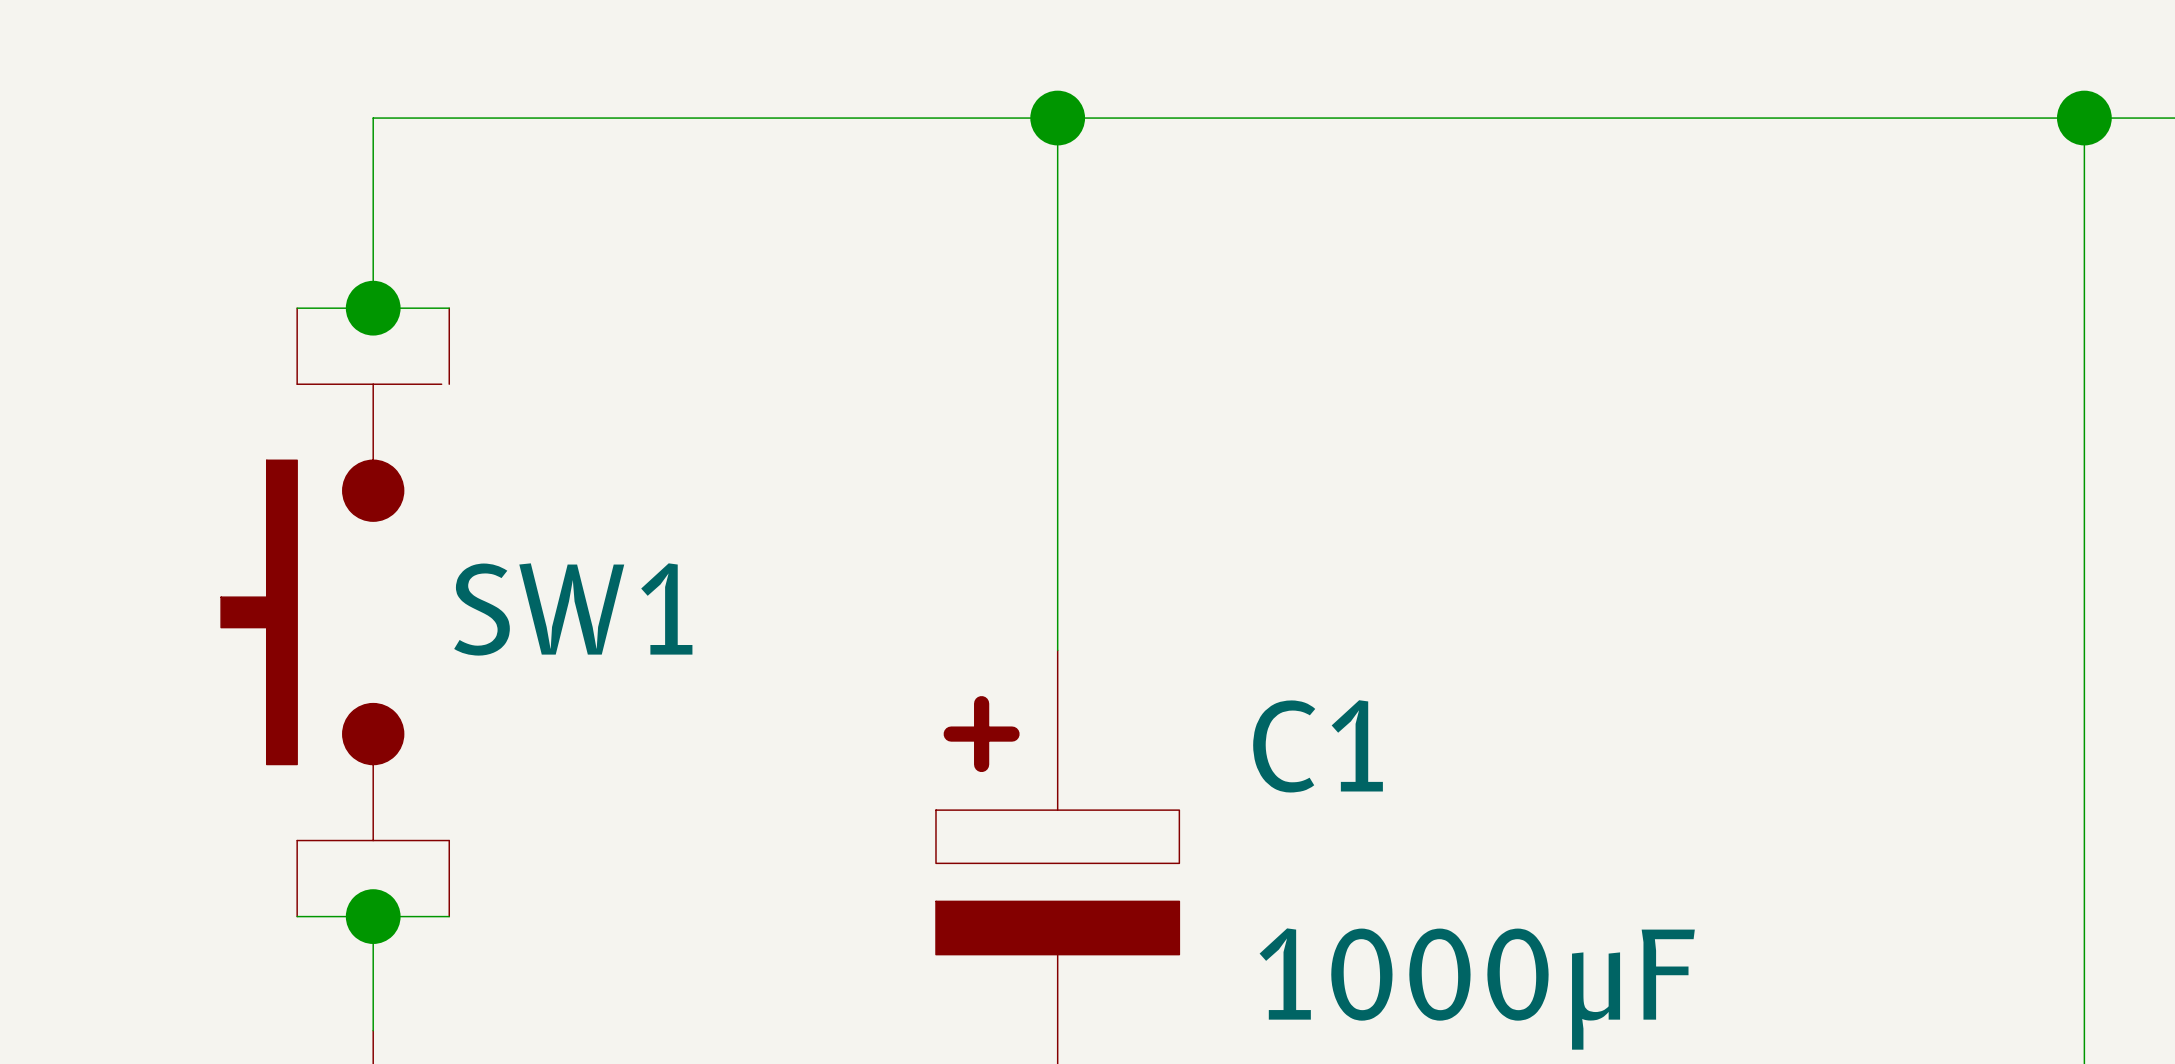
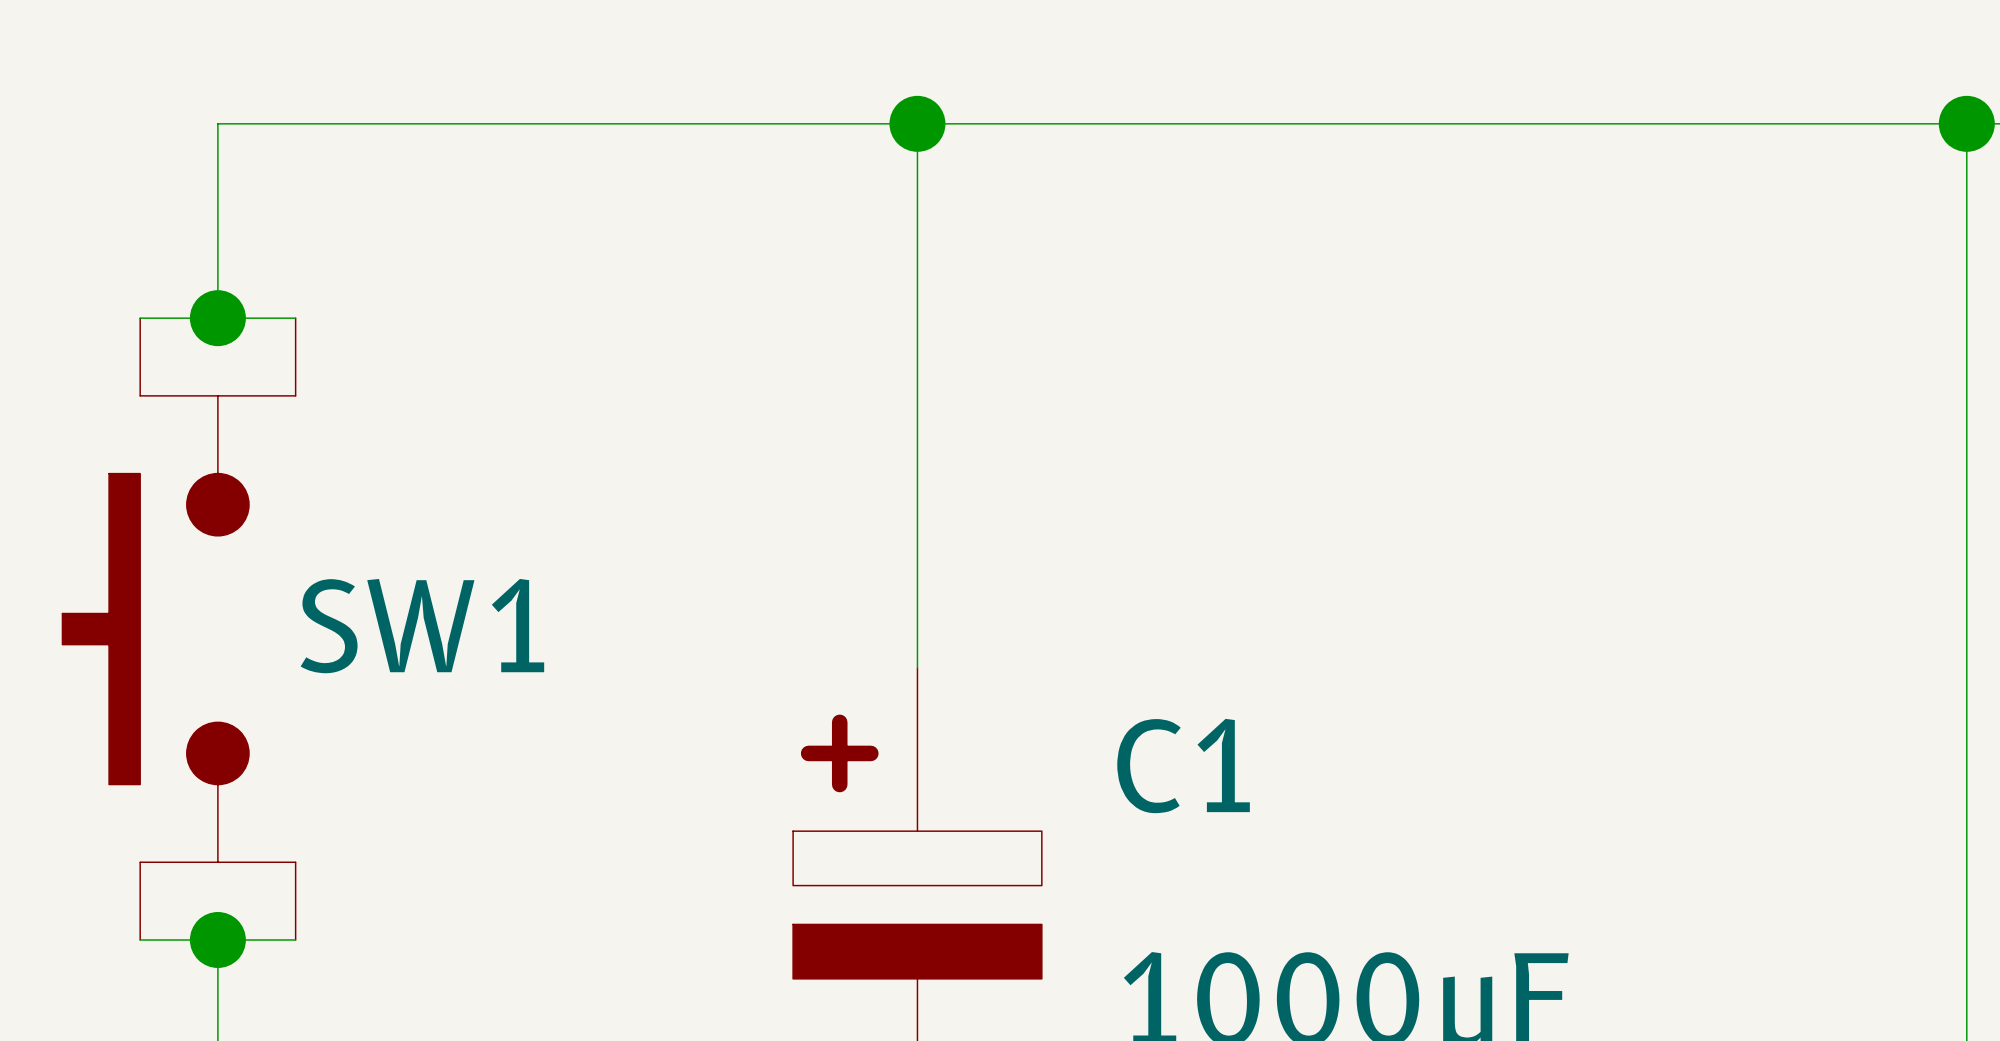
SW1 symbol: [221, 308, 450, 917] -> [62, 318, 296, 940]

